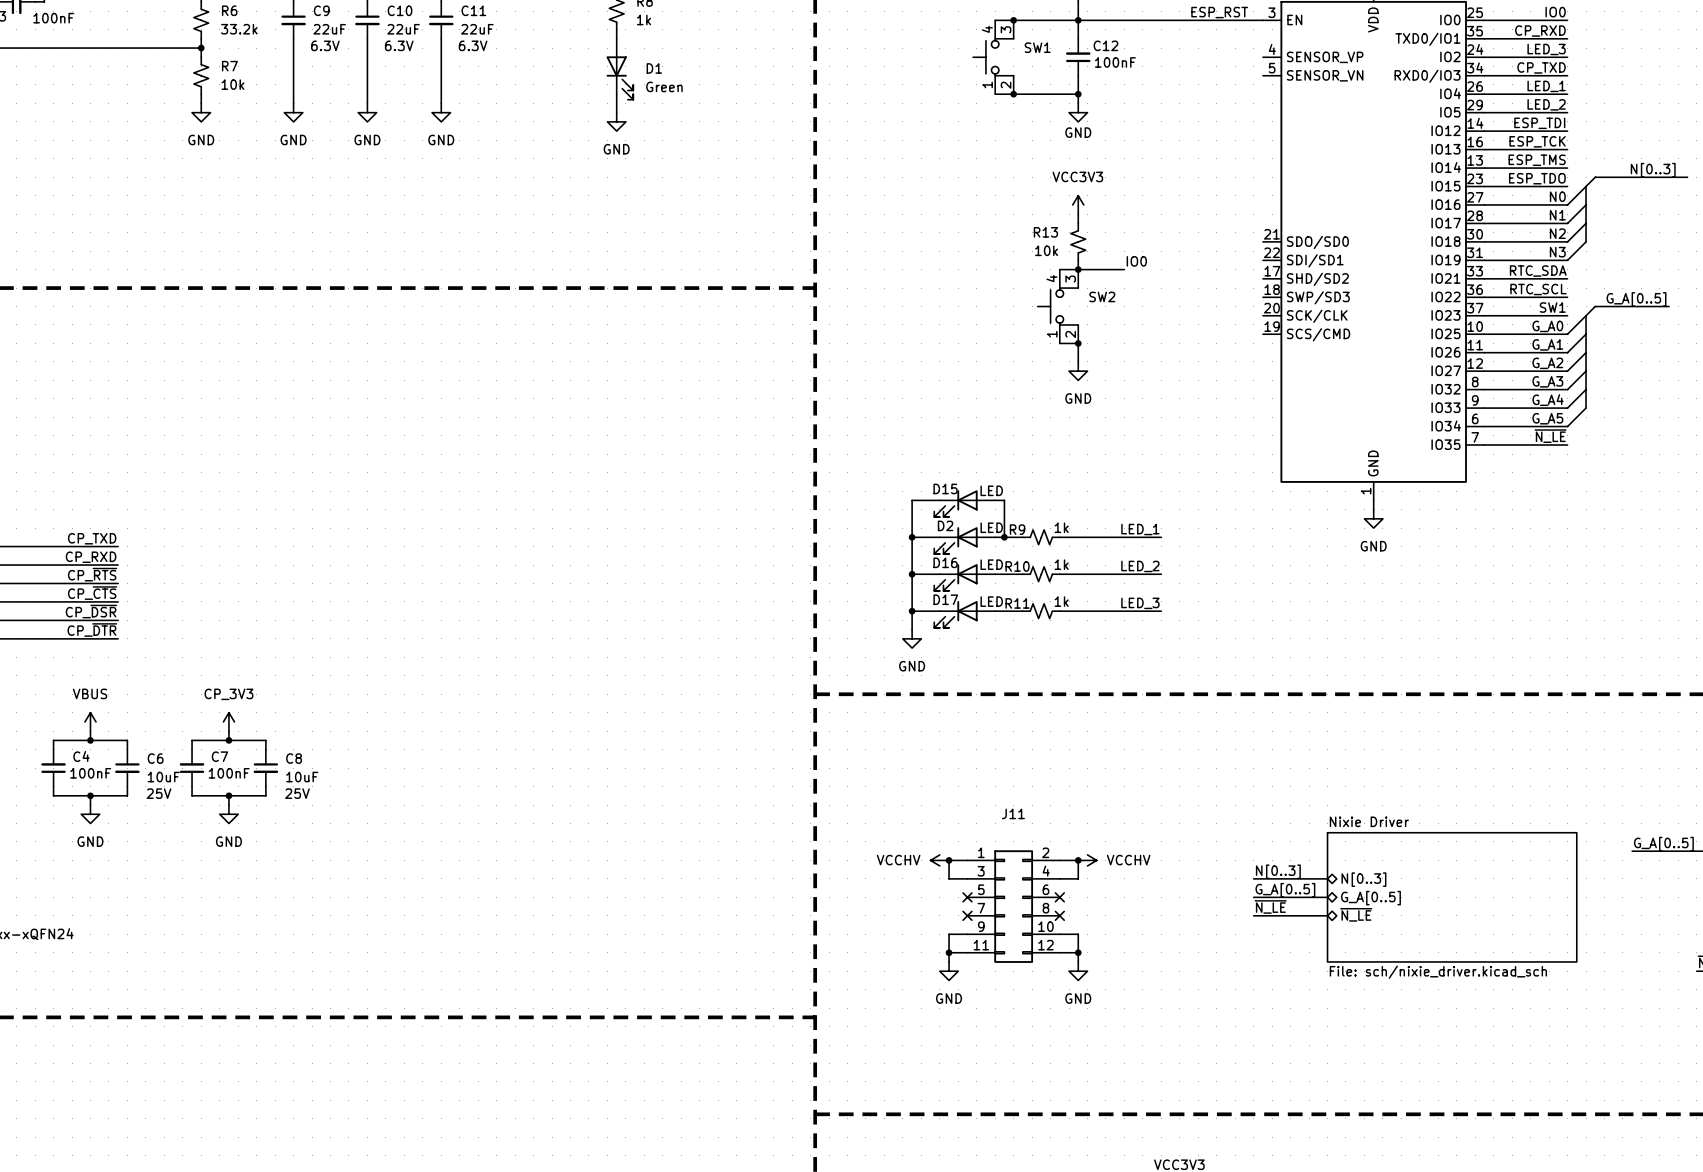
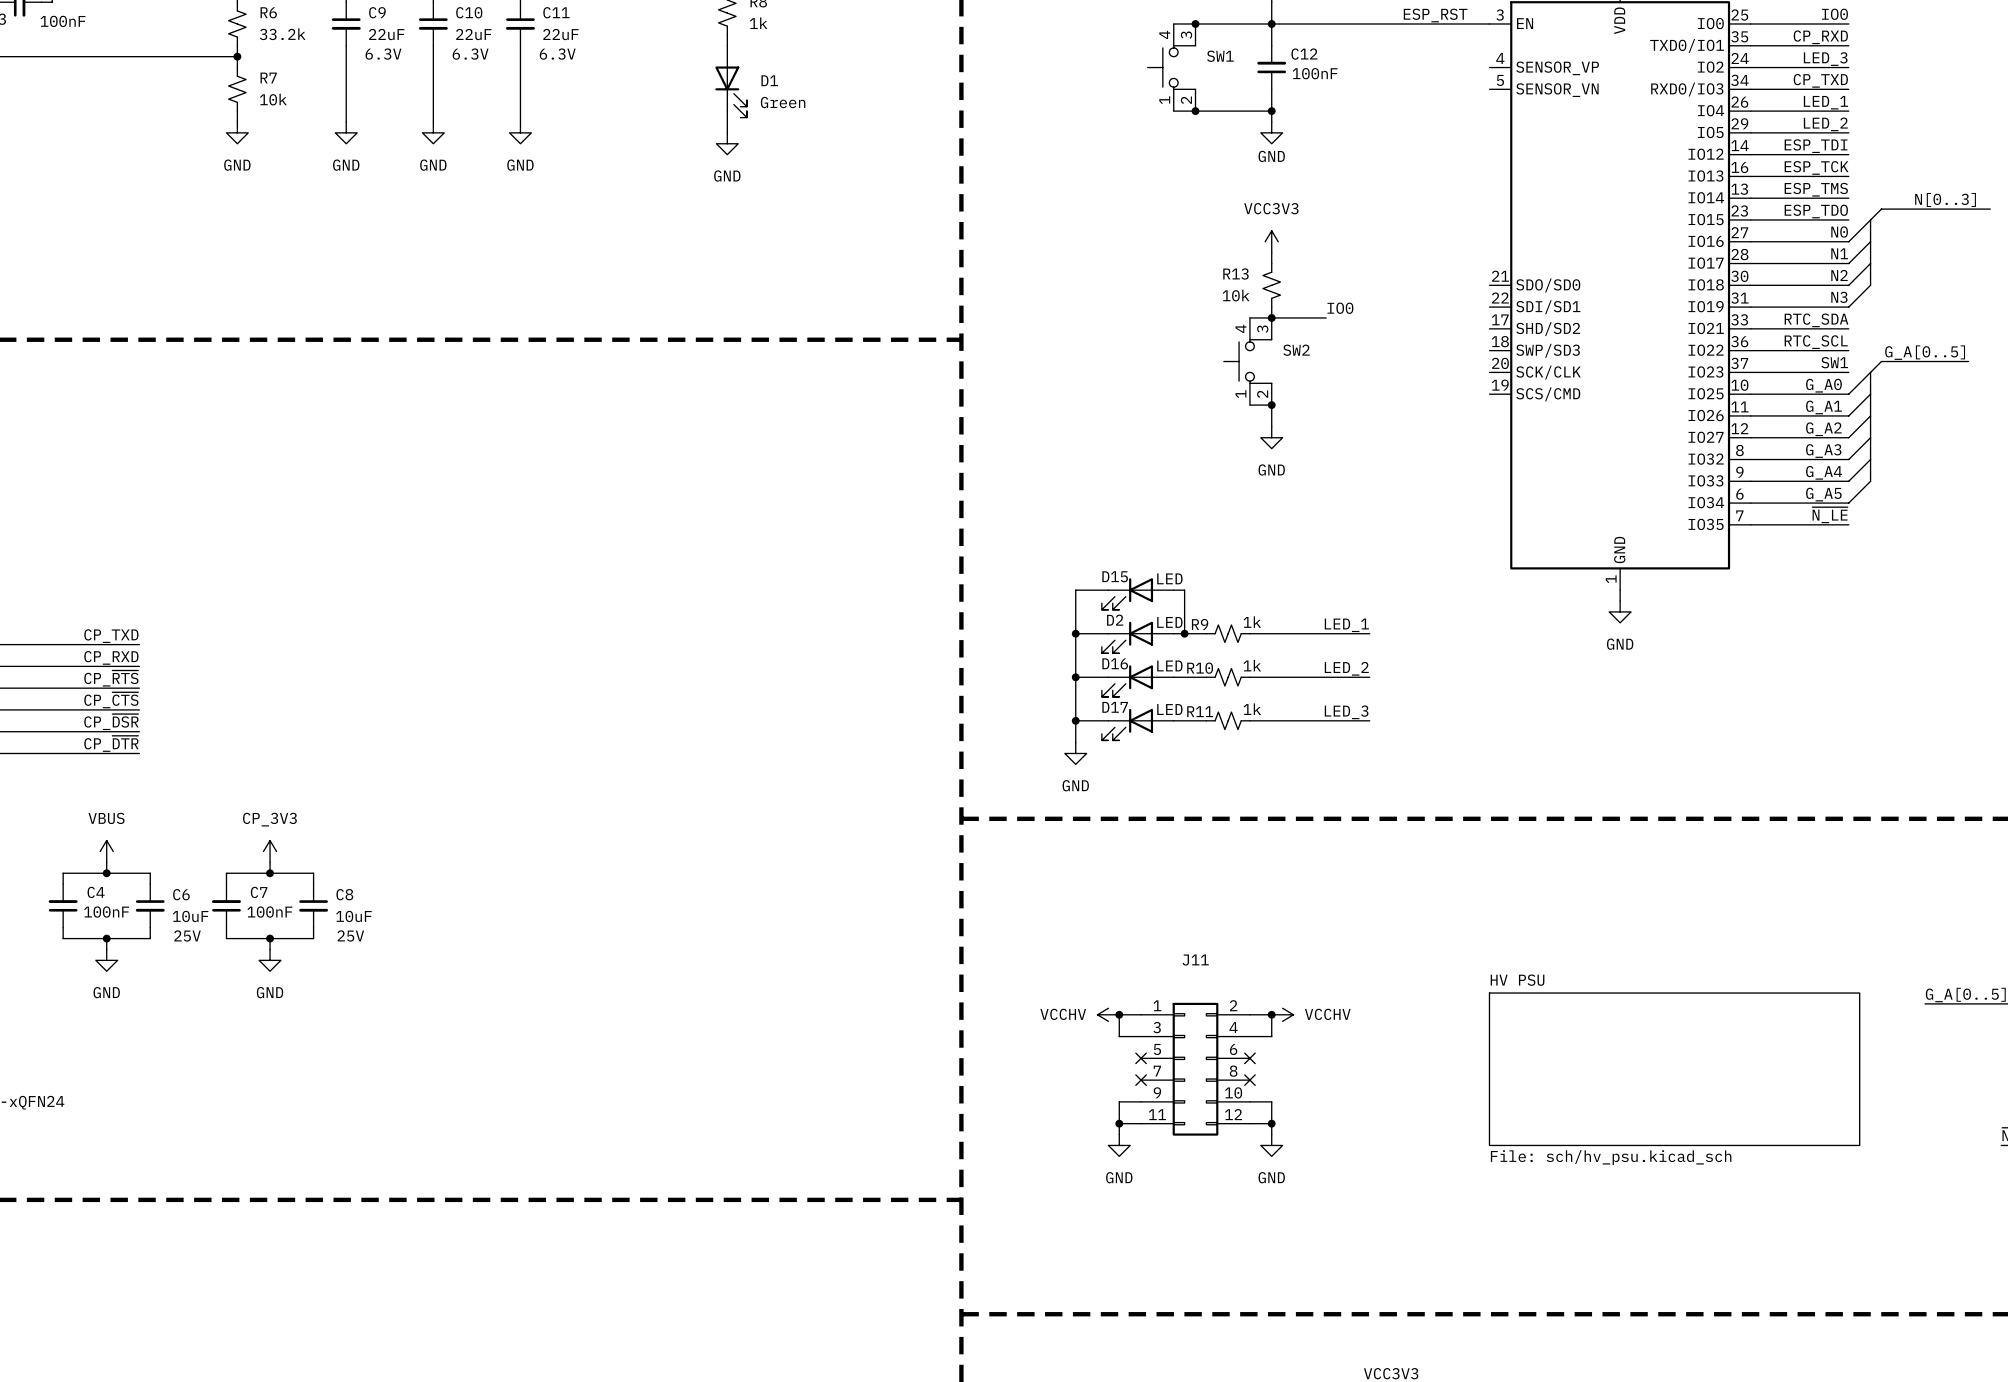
label: N[0..3] (1278, 871) -> none
bus: (1253, 878) (1327, 878) -> none
sheet pin: N[0..3] (1363, 879) -> none
label: G_A[0..5] (1285, 890) -> none
bus: (1253, 897) (1327, 897) -> none
sheet Nixie Driver: File: sch/nixie_driver.kicad_sch (1452, 897) -> none
sheet pin: G_A[0..5] (1370, 898) -> none
label: ~{N_LE} (1270, 906) -> none
sheet HV PSU: none -> File: sch/hv_psu.kicad_sch (1674, 1069)
sheet pin: ~{N_LE} (1356, 914) -> none
wire: (1253, 915) (1327, 915) -> none

